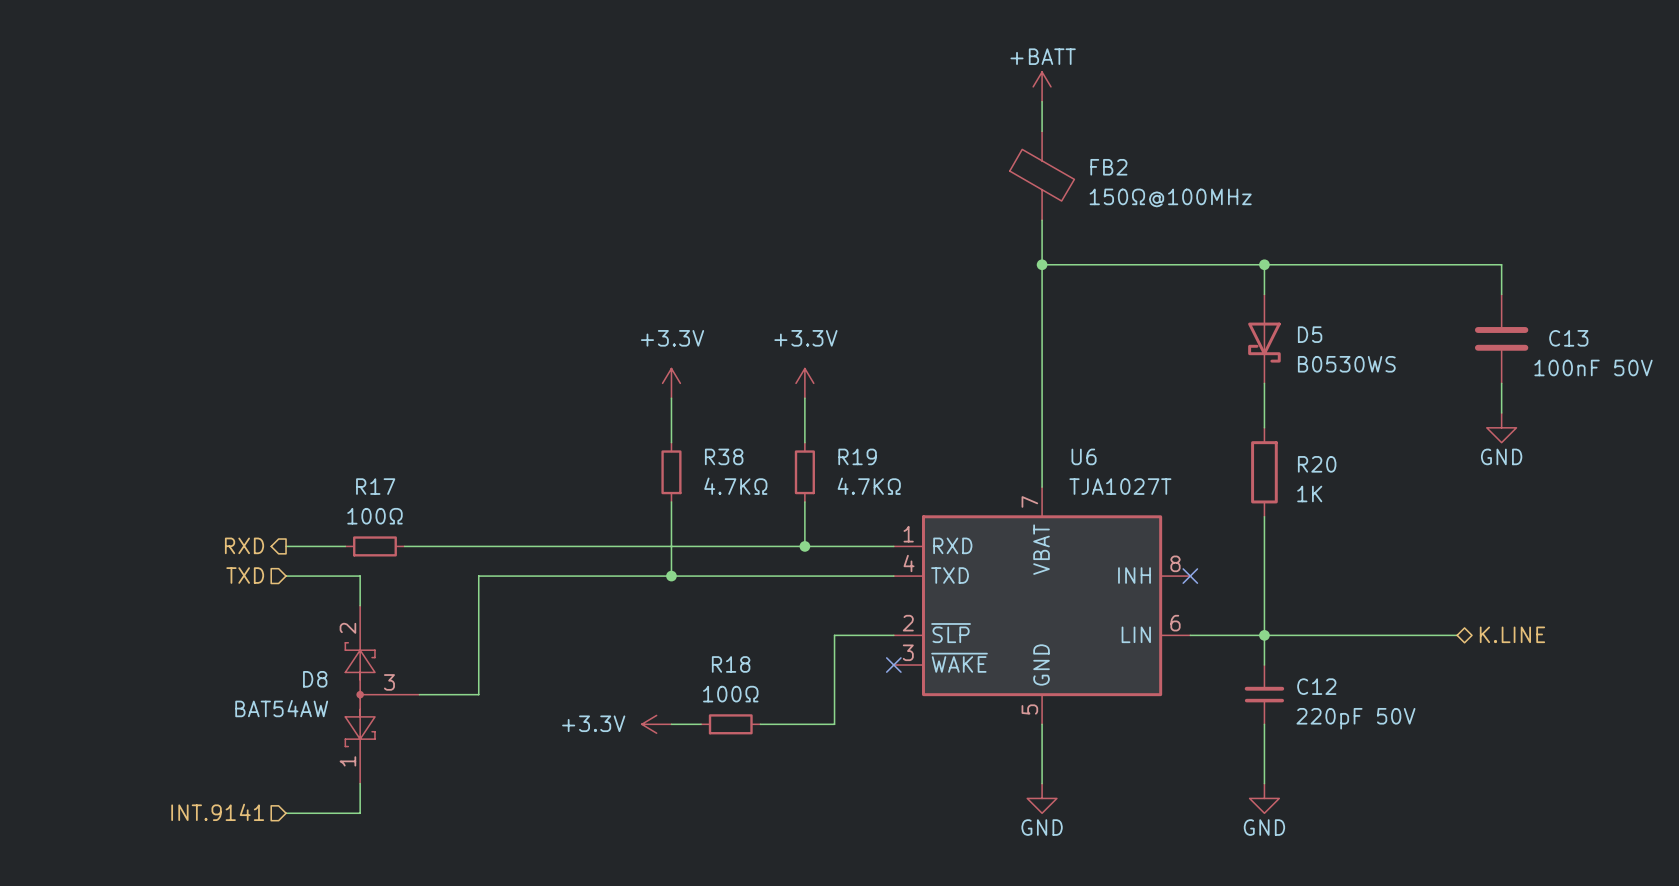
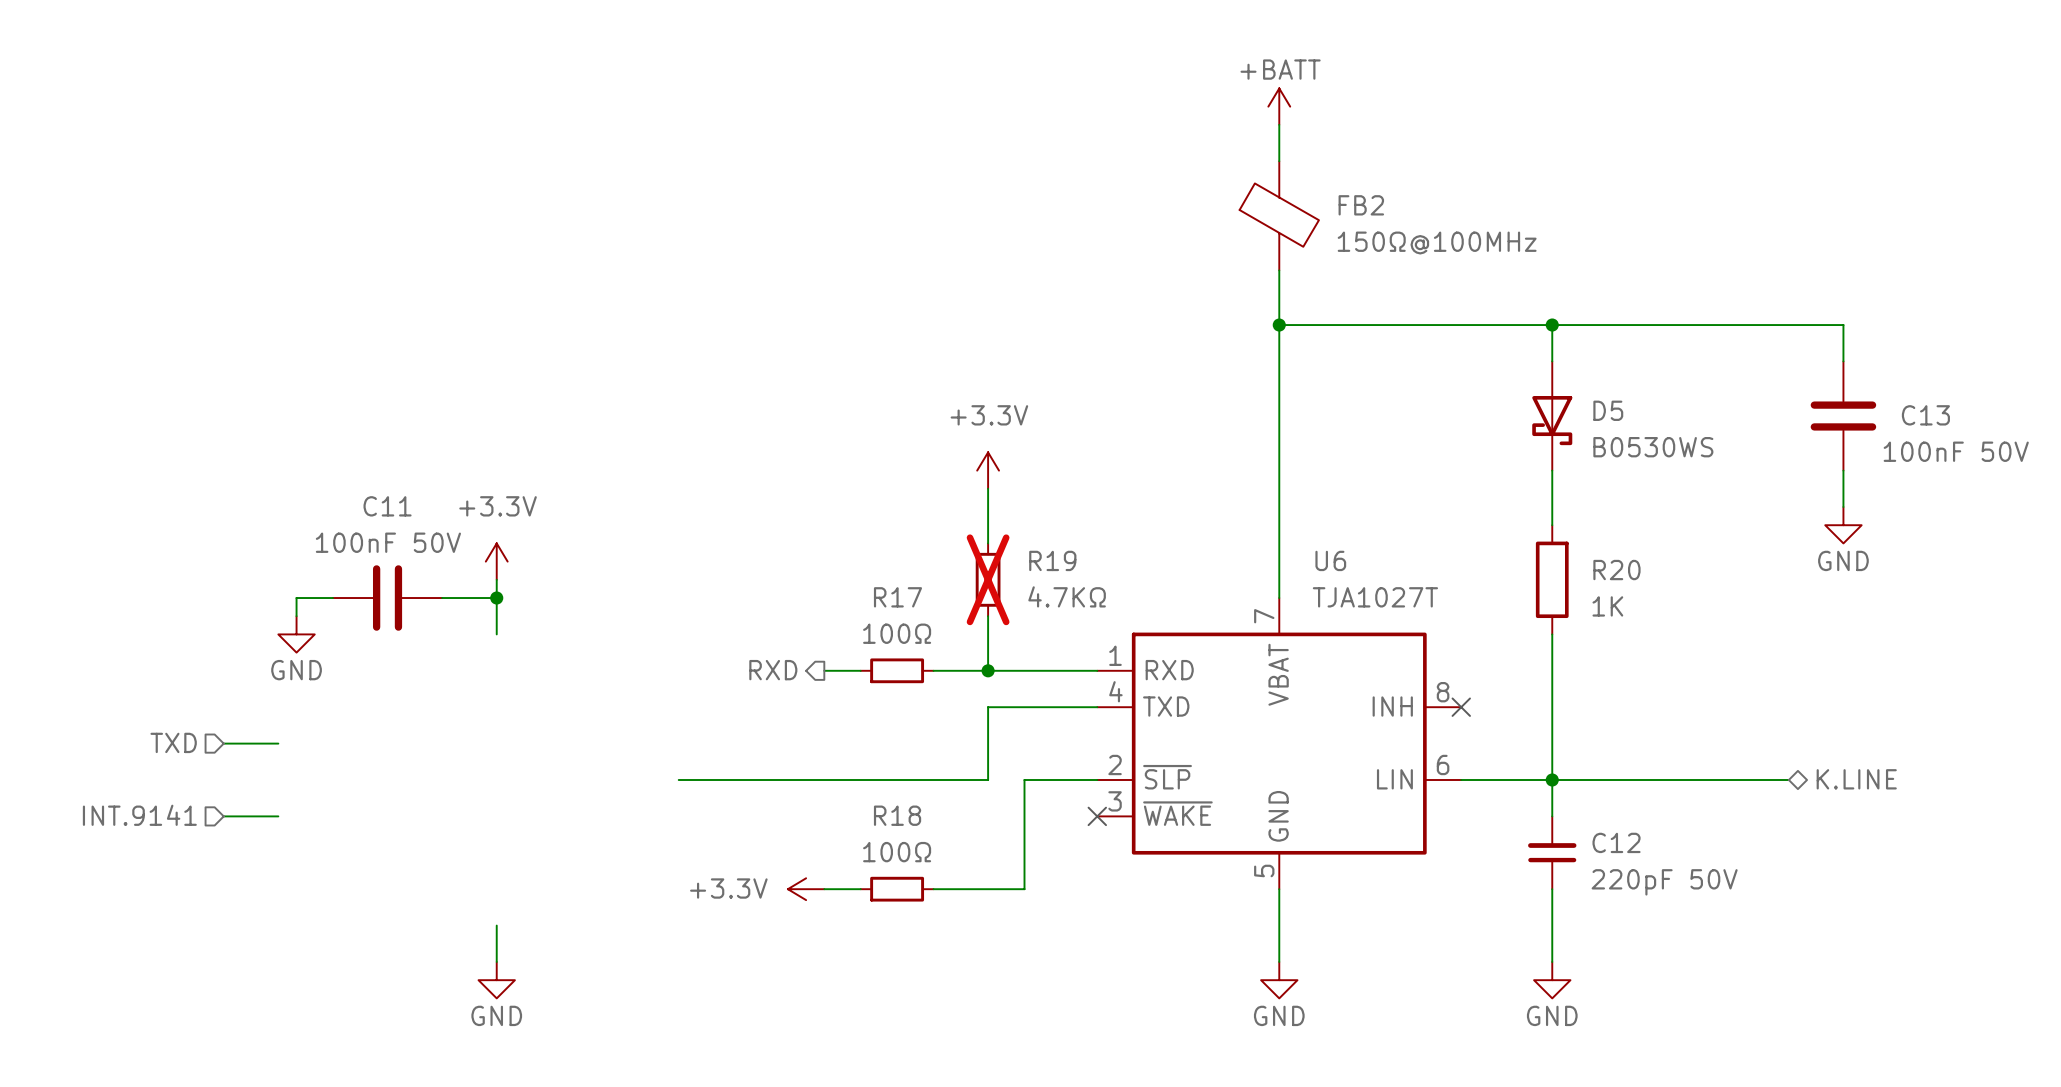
power symbol position: +3.3V (671, 383) -> +3.3V (496, 561)
wire: (671, 398) (671, 442) -> (496, 579) (496, 634)
R38: 4.7KΩ (671, 472) -> none
R19 do-not-place cross: none -> (988, 579)
wire: none -> (332, 598) (296, 598) (296, 616)
C11: none -> 100nF 50V (387, 598)
wire: none -> (442, 598) (496, 598)
junction: none -> (496, 598)
wire: (671, 501) (671, 576) -> none
power symbol: none -> GND (296, 634)
hierarchical label: RXD (244, 545) -> none
hierarchical label: none -> RXD (773, 670)
wire: (286, 546) (345, 546) -> none
R17 position: (374, 546) -> (897, 670)
wire: (404, 546) (671, 546) -> none
wire: (701, 546) (760, 546) -> none
hierarchical label position: TXD (245, 575) -> TXD (173, 742)
wire: (286, 576) (360, 576) (360, 605) -> none
junction: (671, 576) -> none
wire: (804, 576) (478, 576) (478, 694) (419, 694) -> (988, 707) (988, 779) (678, 779)
wire: none -> (223, 743) (278, 743)
wire: none -> (223, 816) (278, 816)
D8: BAT54AW (382, 694) -> none
wire: none -> (496, 925) (496, 961)
wire: (360, 783) (360, 813) (286, 813) -> none
power symbol: none -> GND (496, 980)
hierarchical label position: INT.9141 (217, 812) -> INT.9141 (139, 815)

